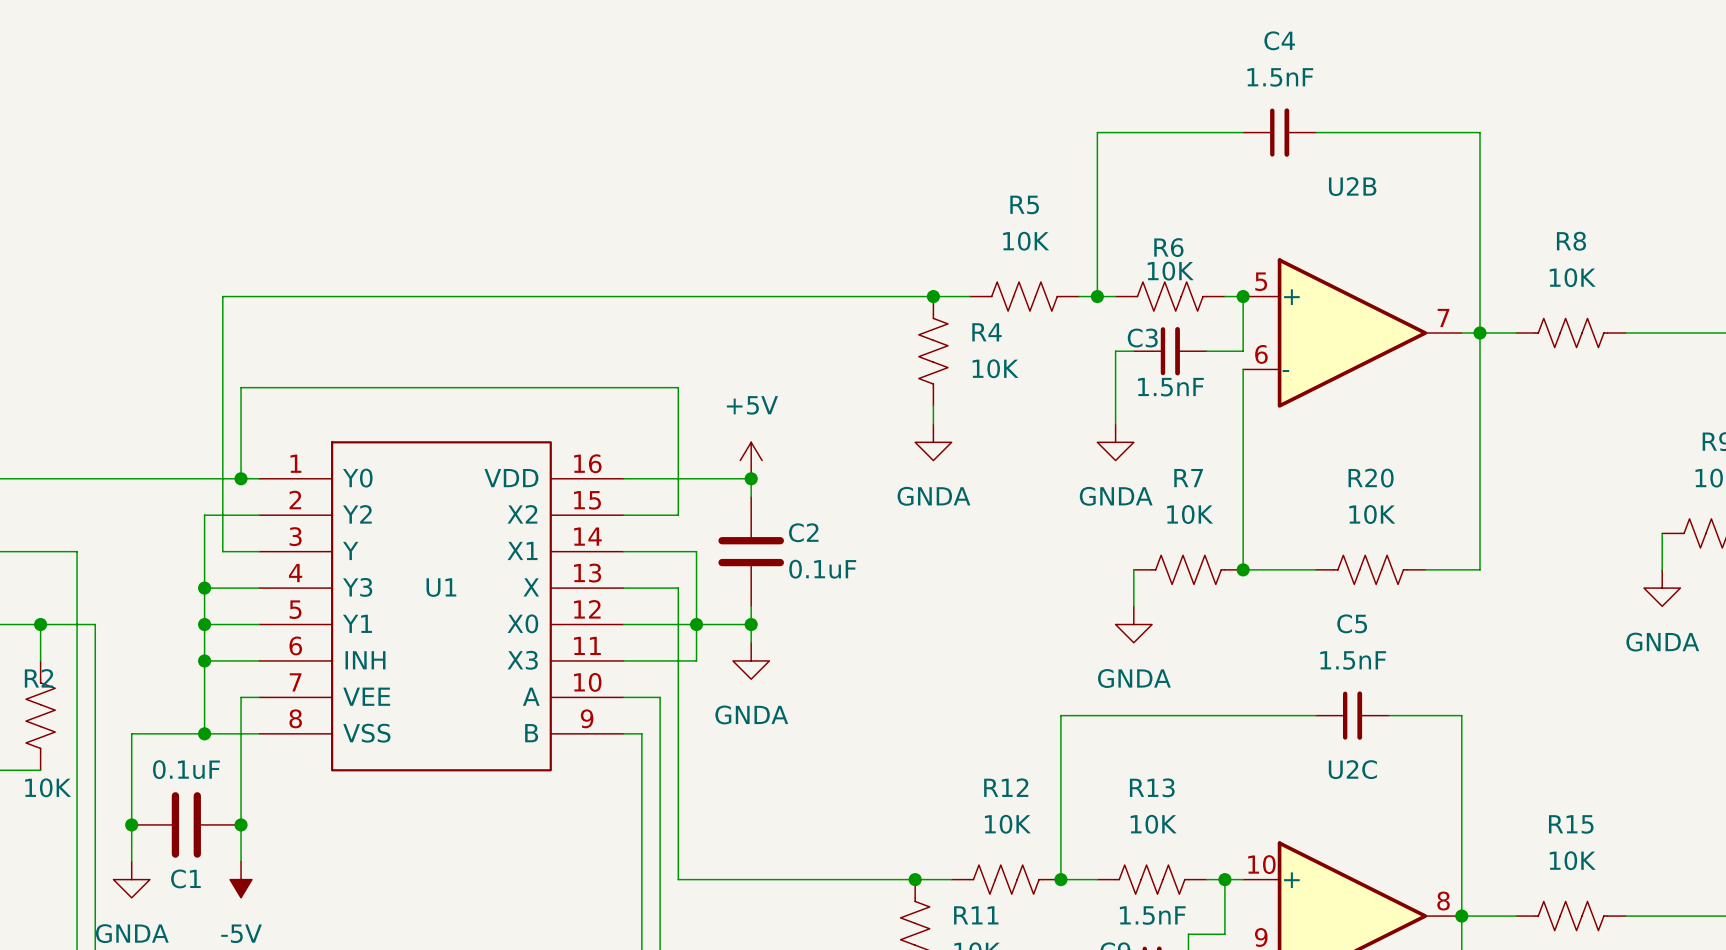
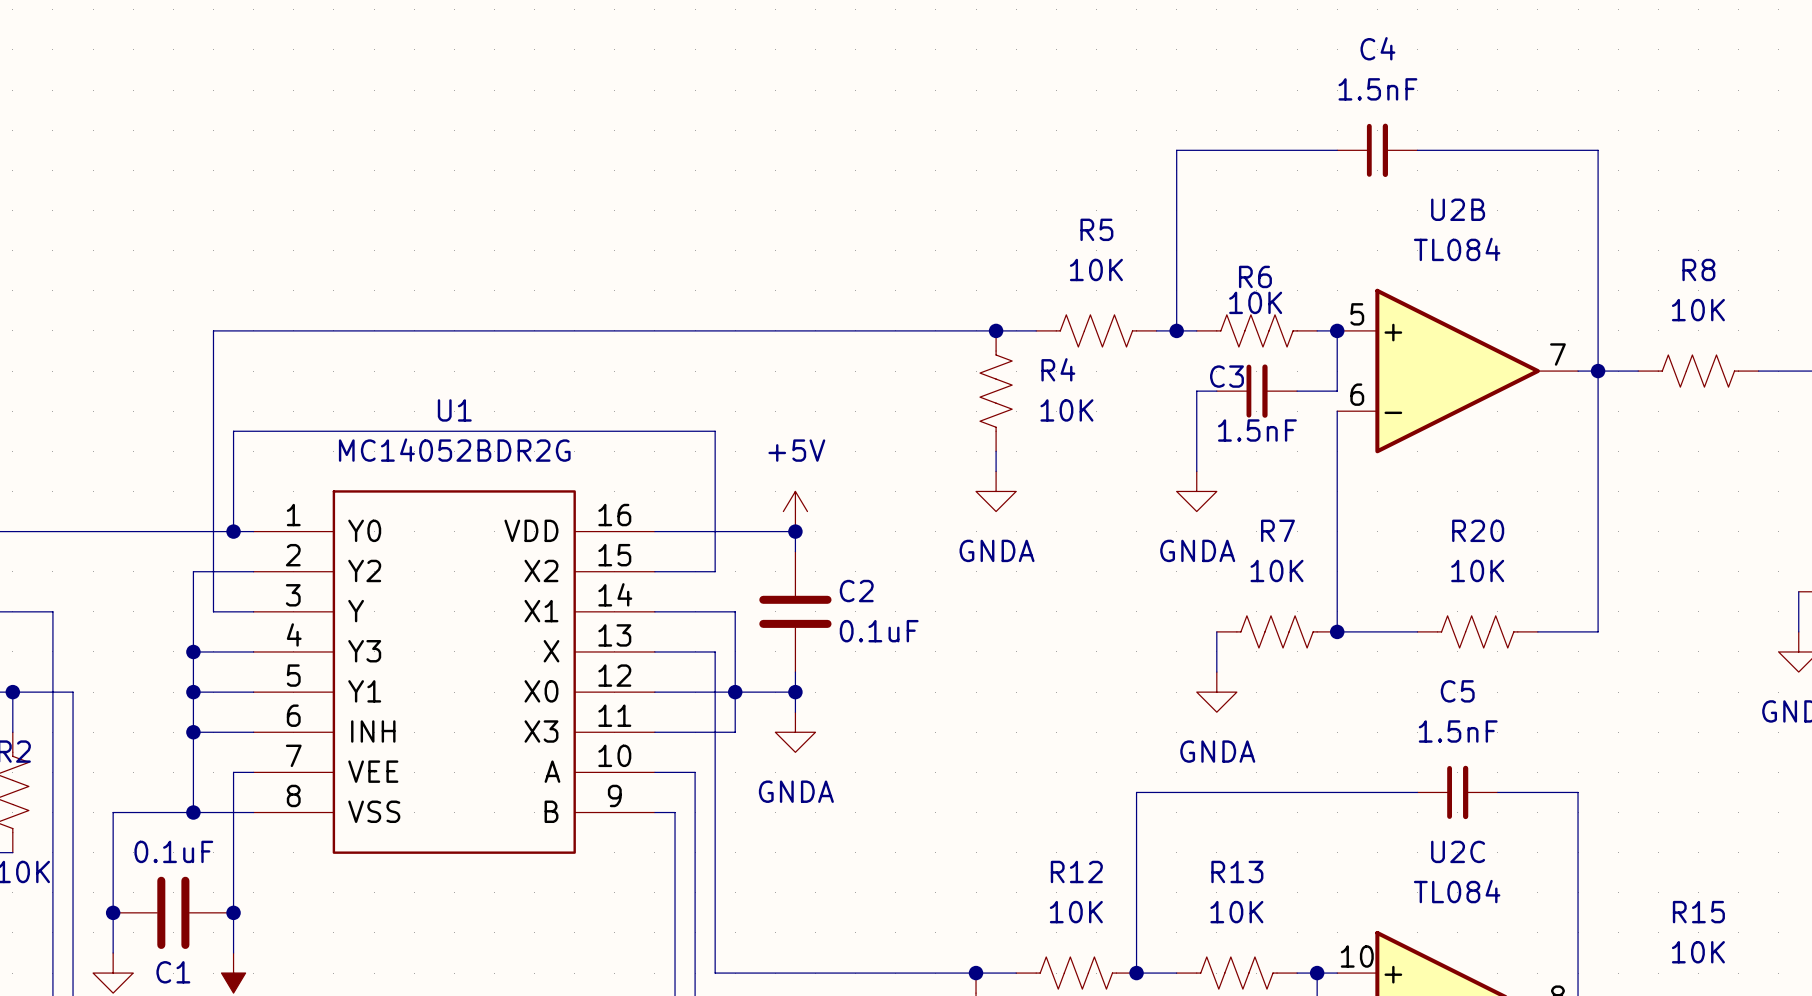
U2B value: none -> TL084 (1457, 249)
U1 value: none -> MC14052BDR2G (454, 450)
U1 name position: U1 (441, 587) -> U1 (454, 410)
U2C value: none -> TL084 (1457, 891)

